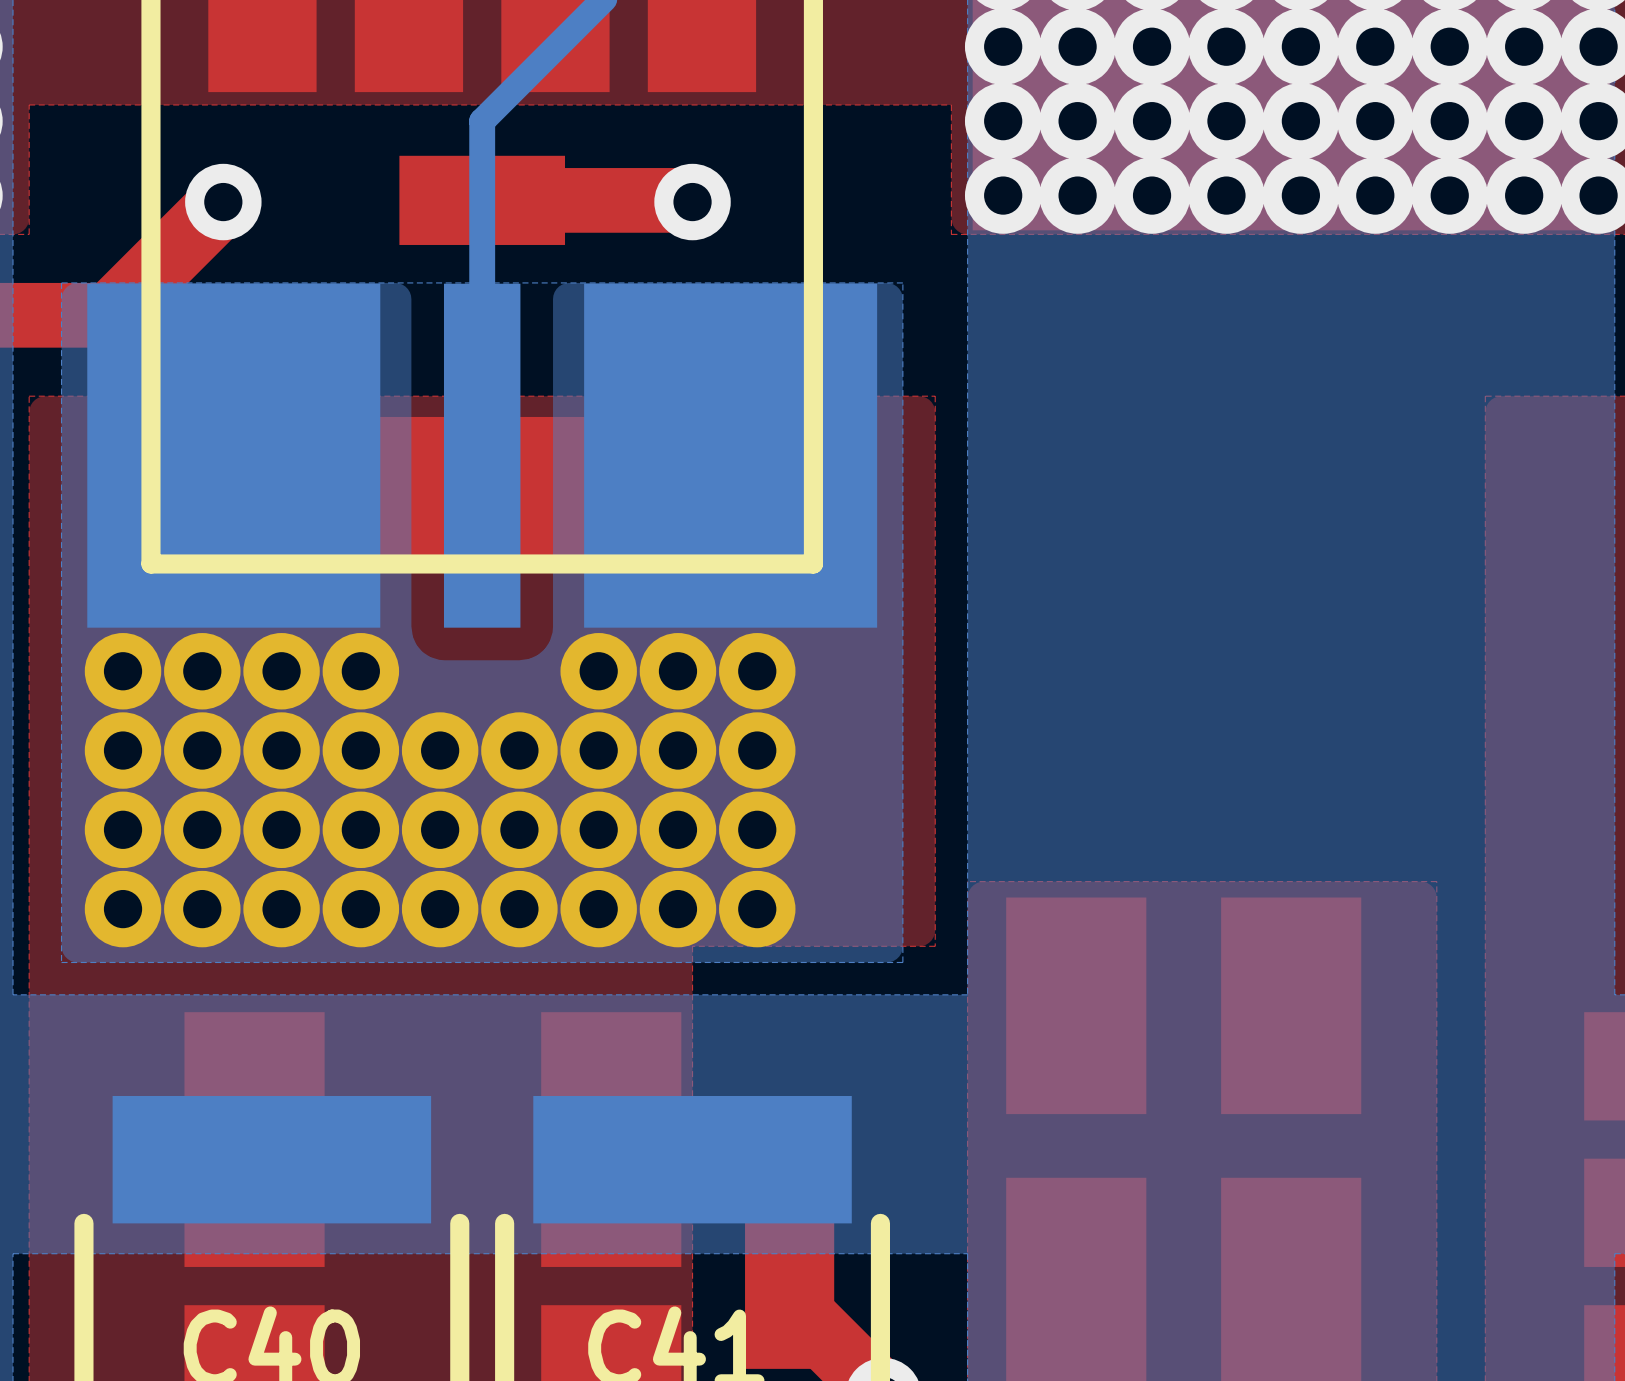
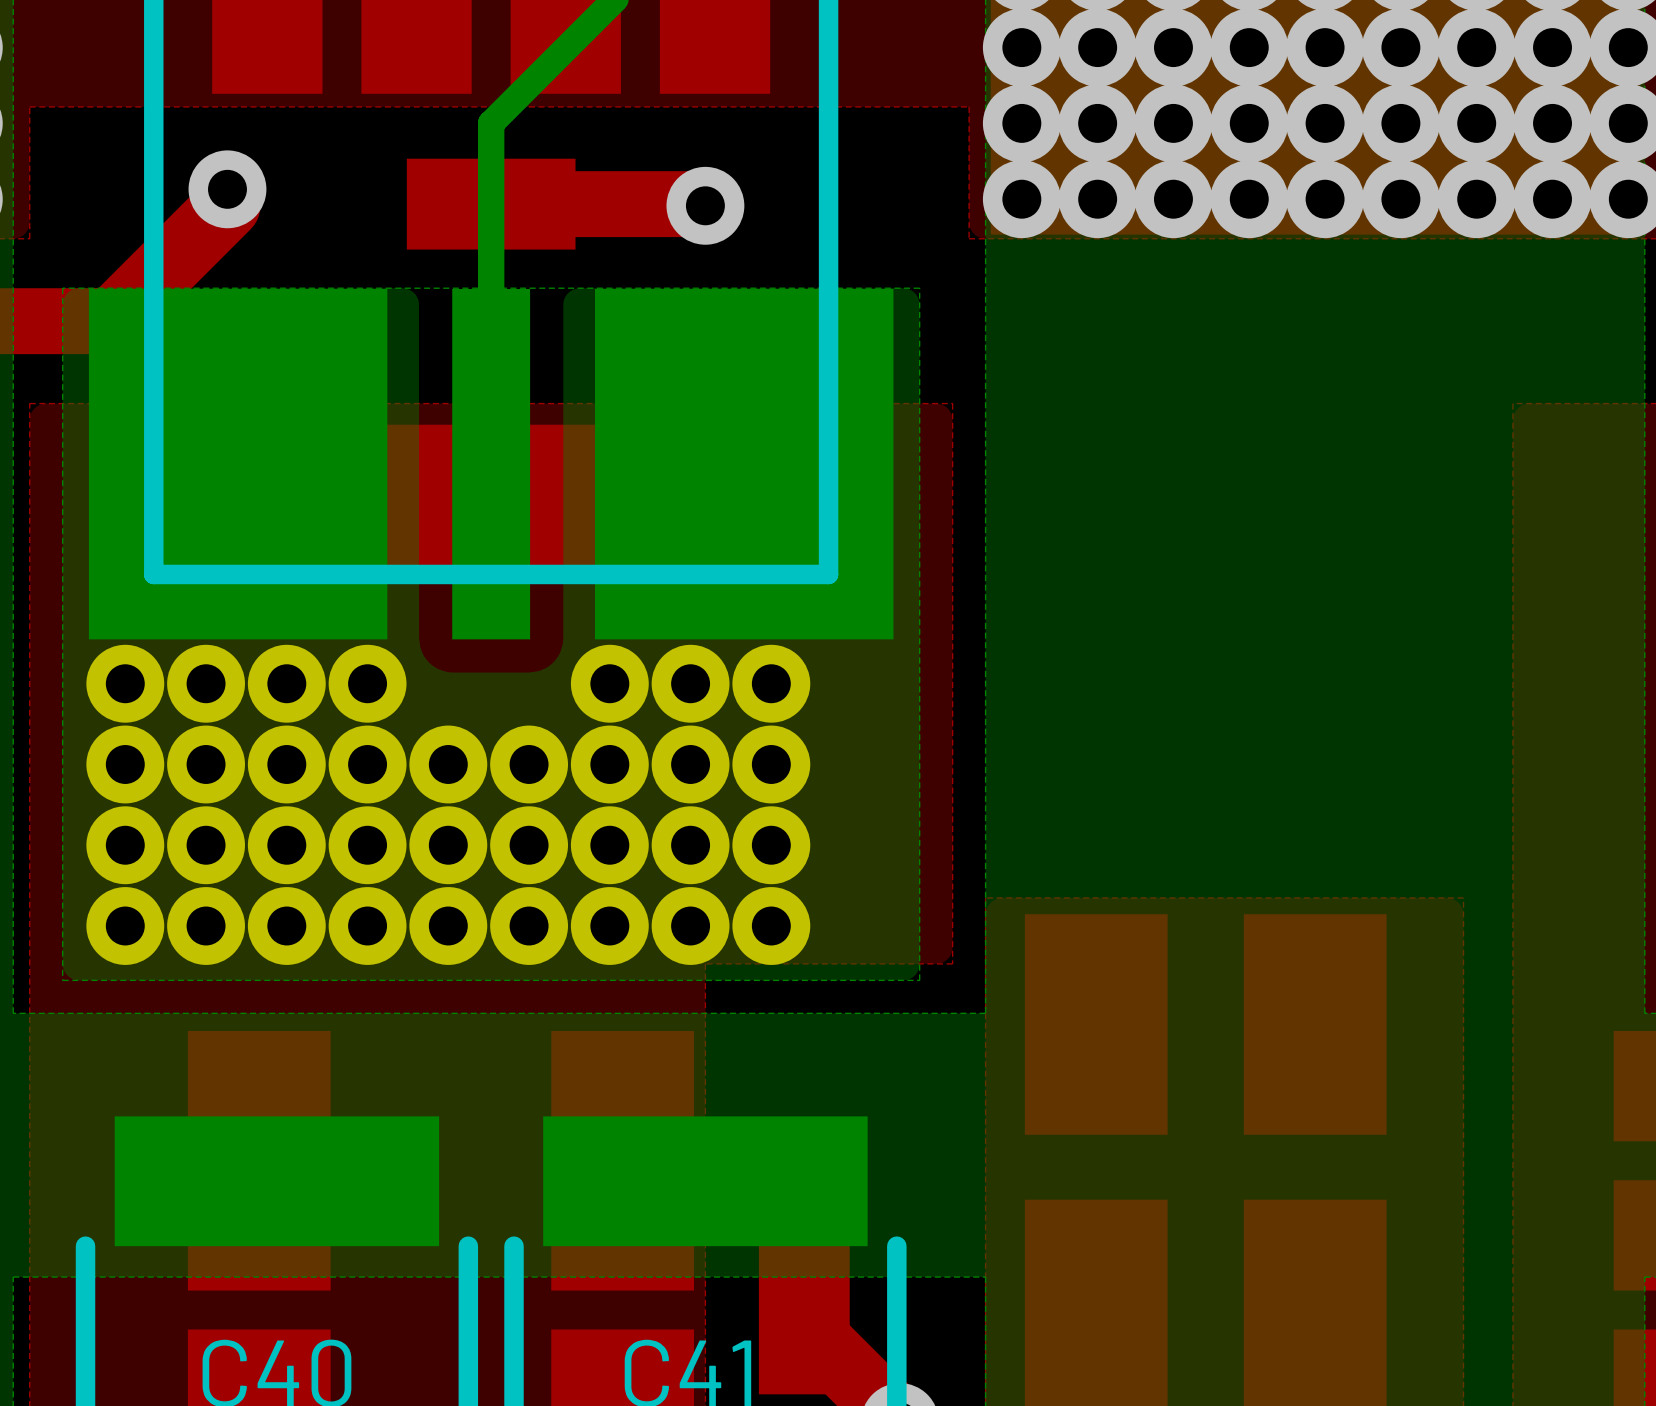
via position: (223, 202) -> (227, 189)

